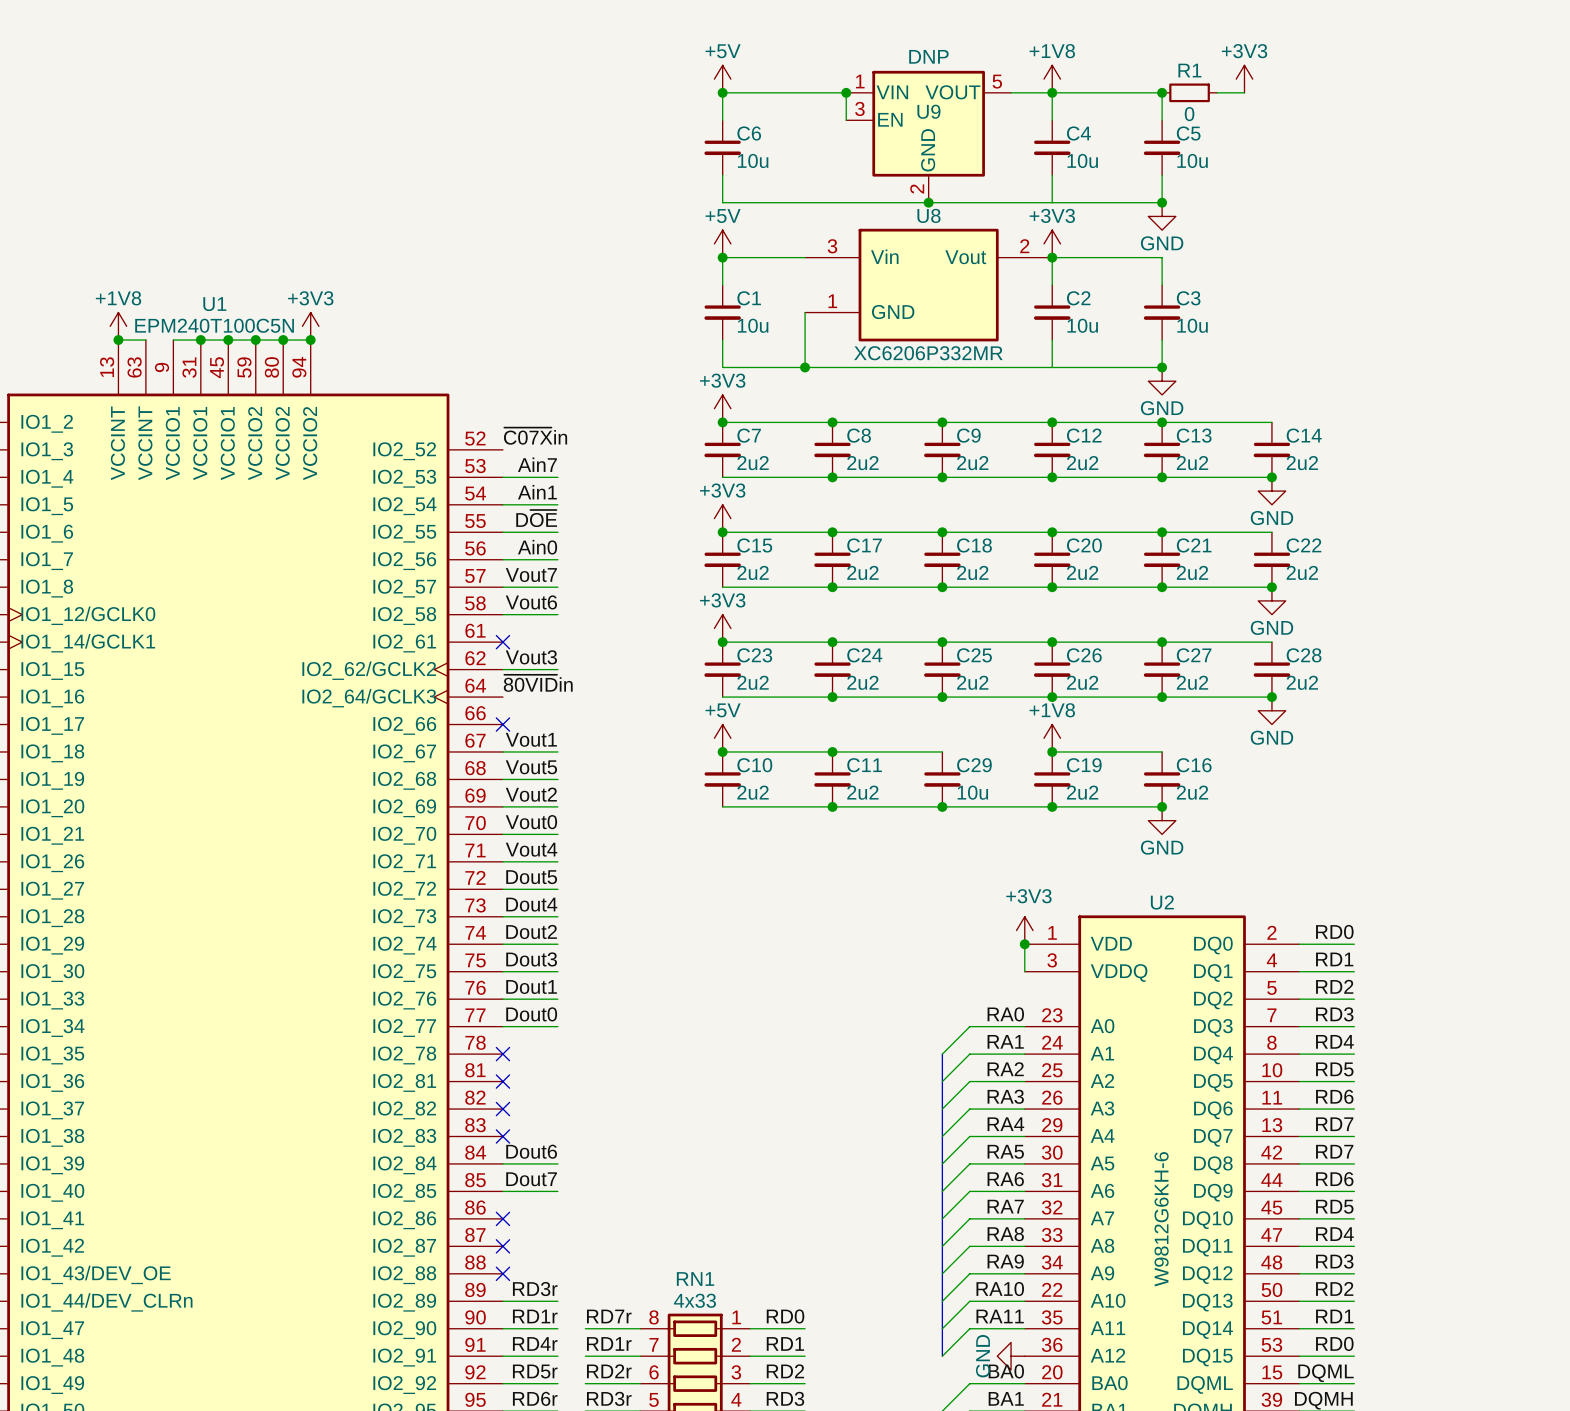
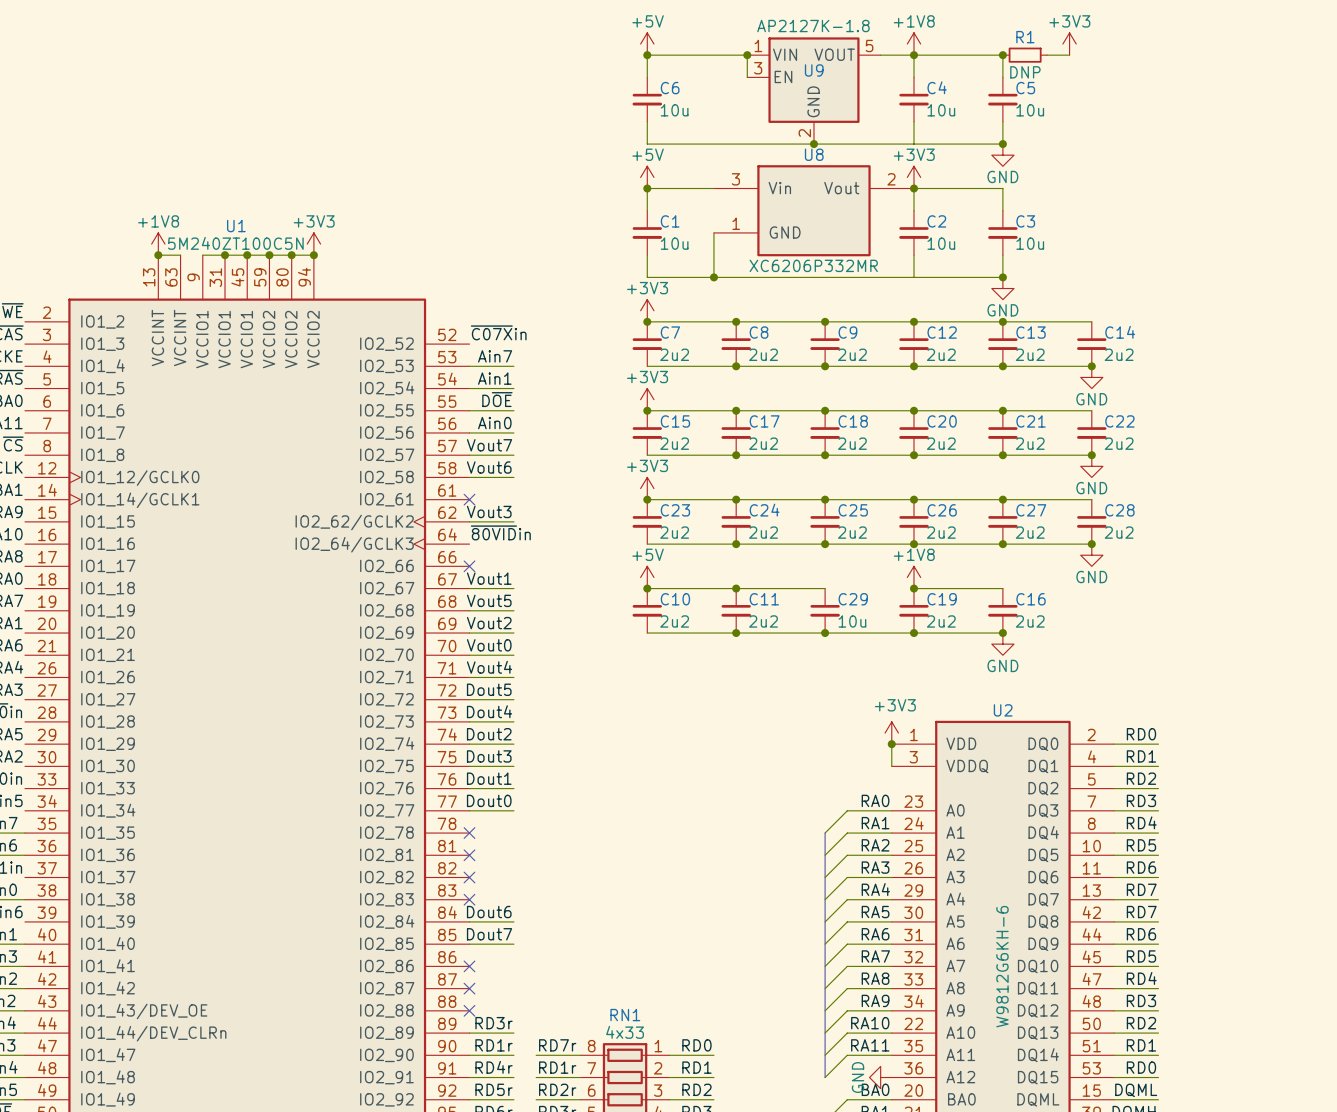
U9 value: DNP (928, 56) -> AP2127K-1.8 (813, 26)
R1 value: 0 (1189, 114) -> DNP (1025, 72)
U1 value: EPM240T100C5N (214, 325) -> 5M240ZT100C5N (235, 243)

